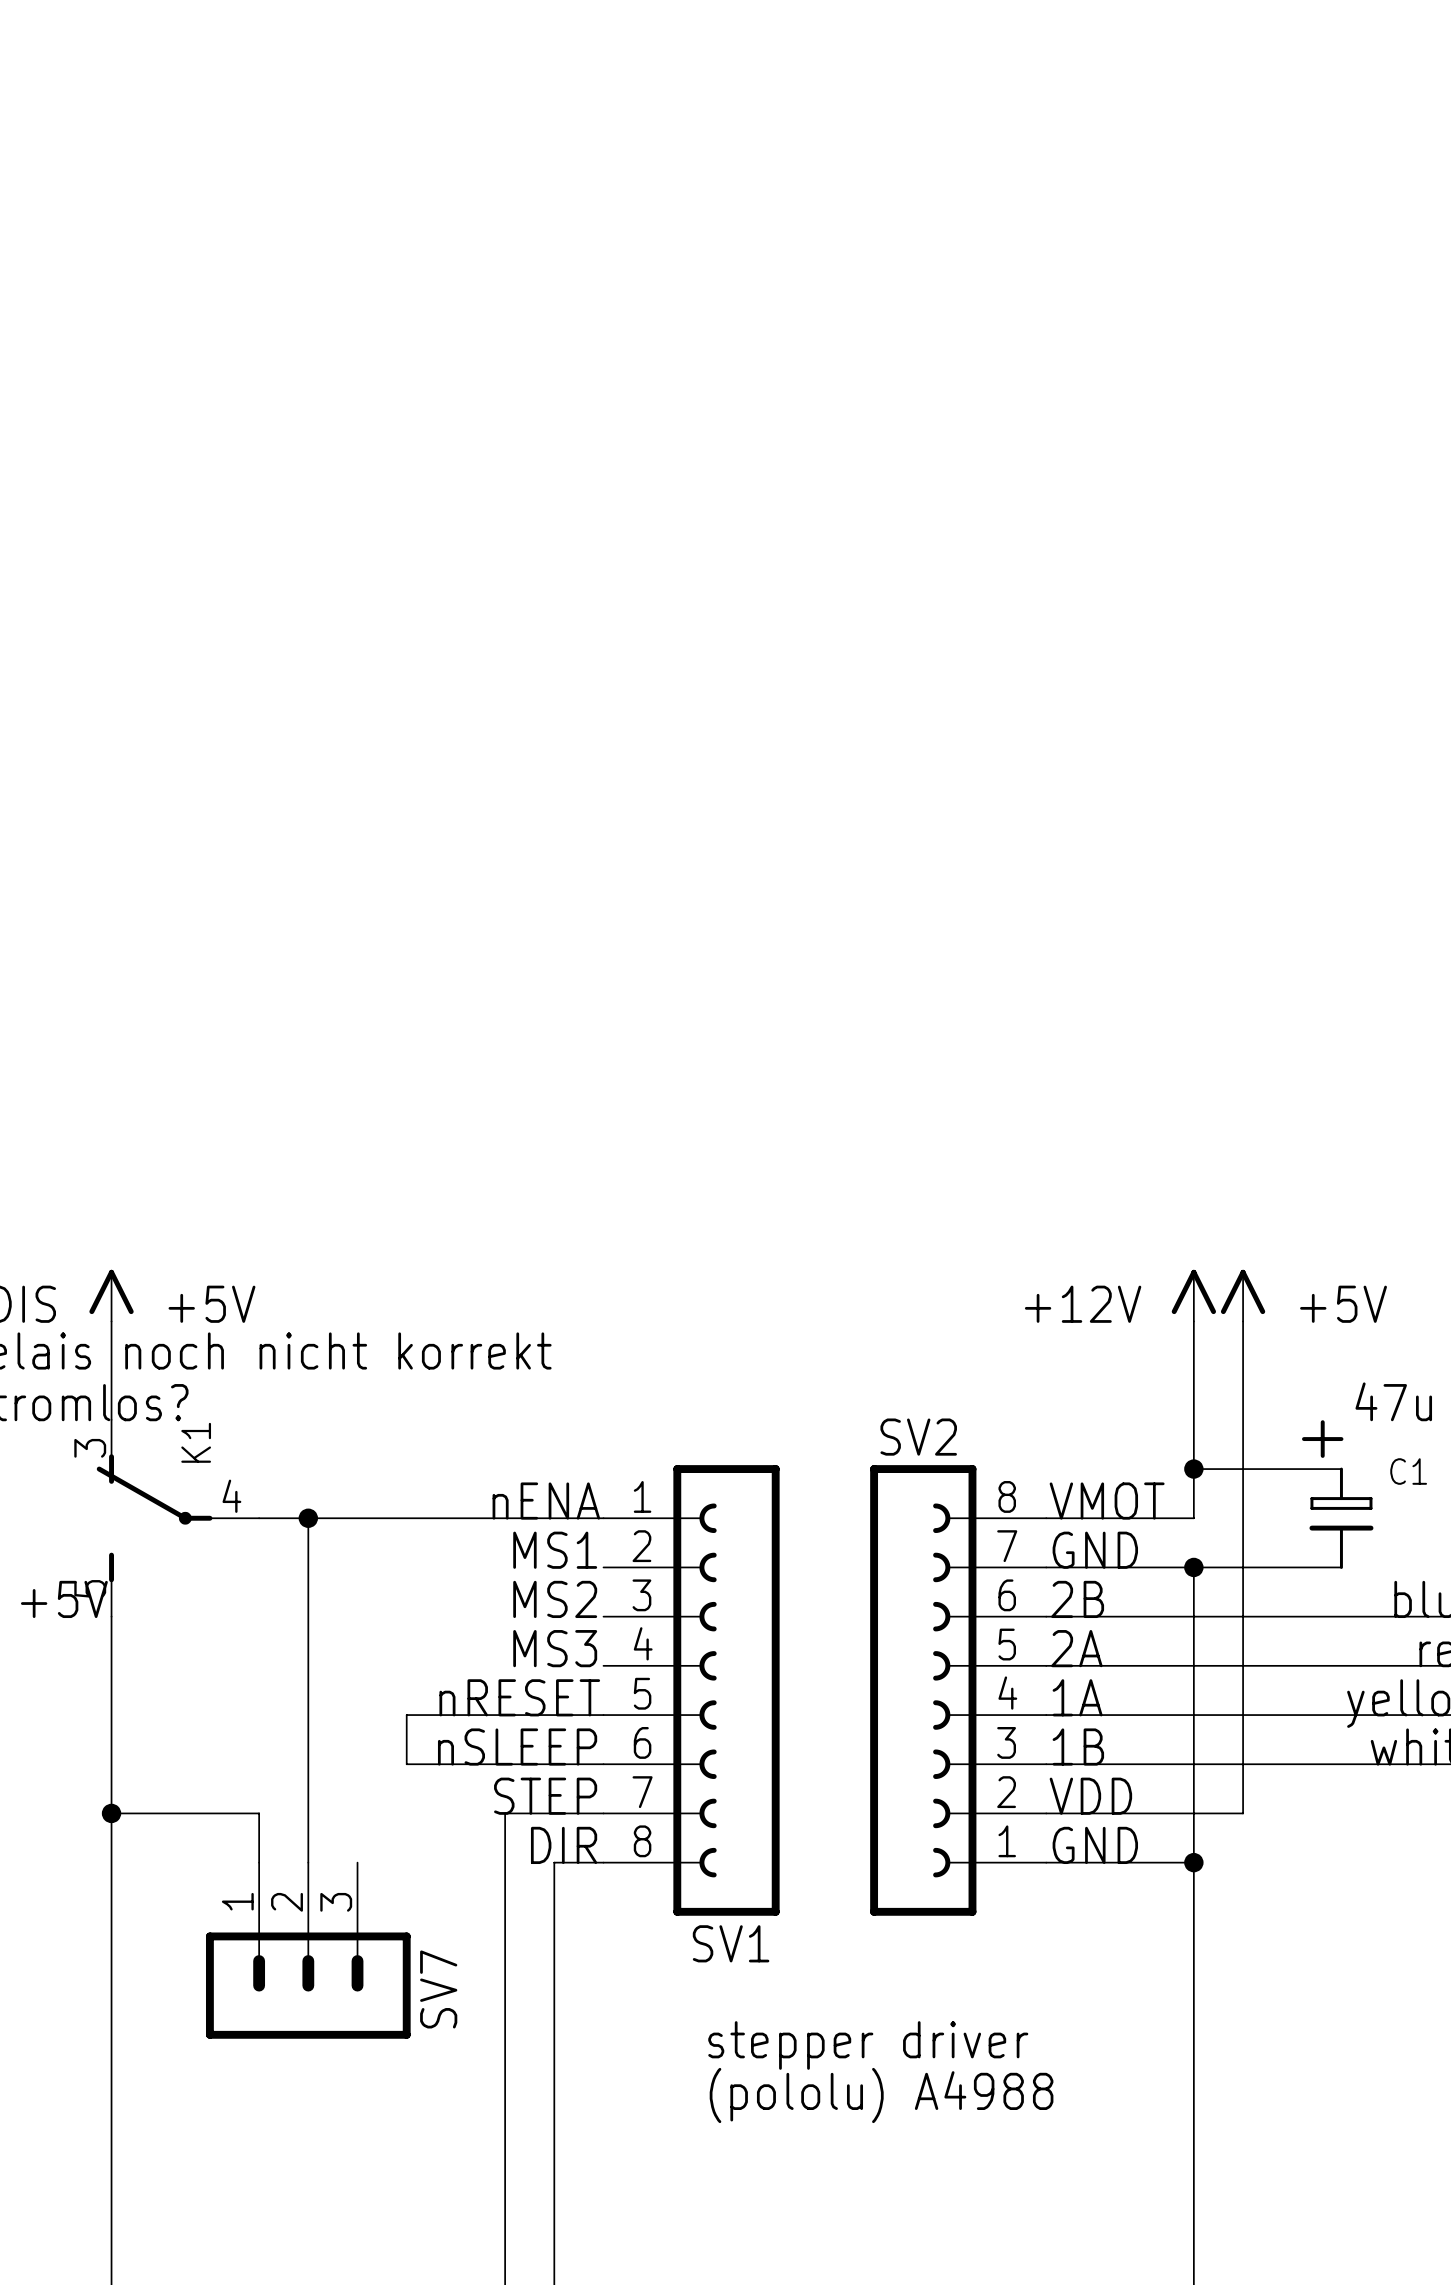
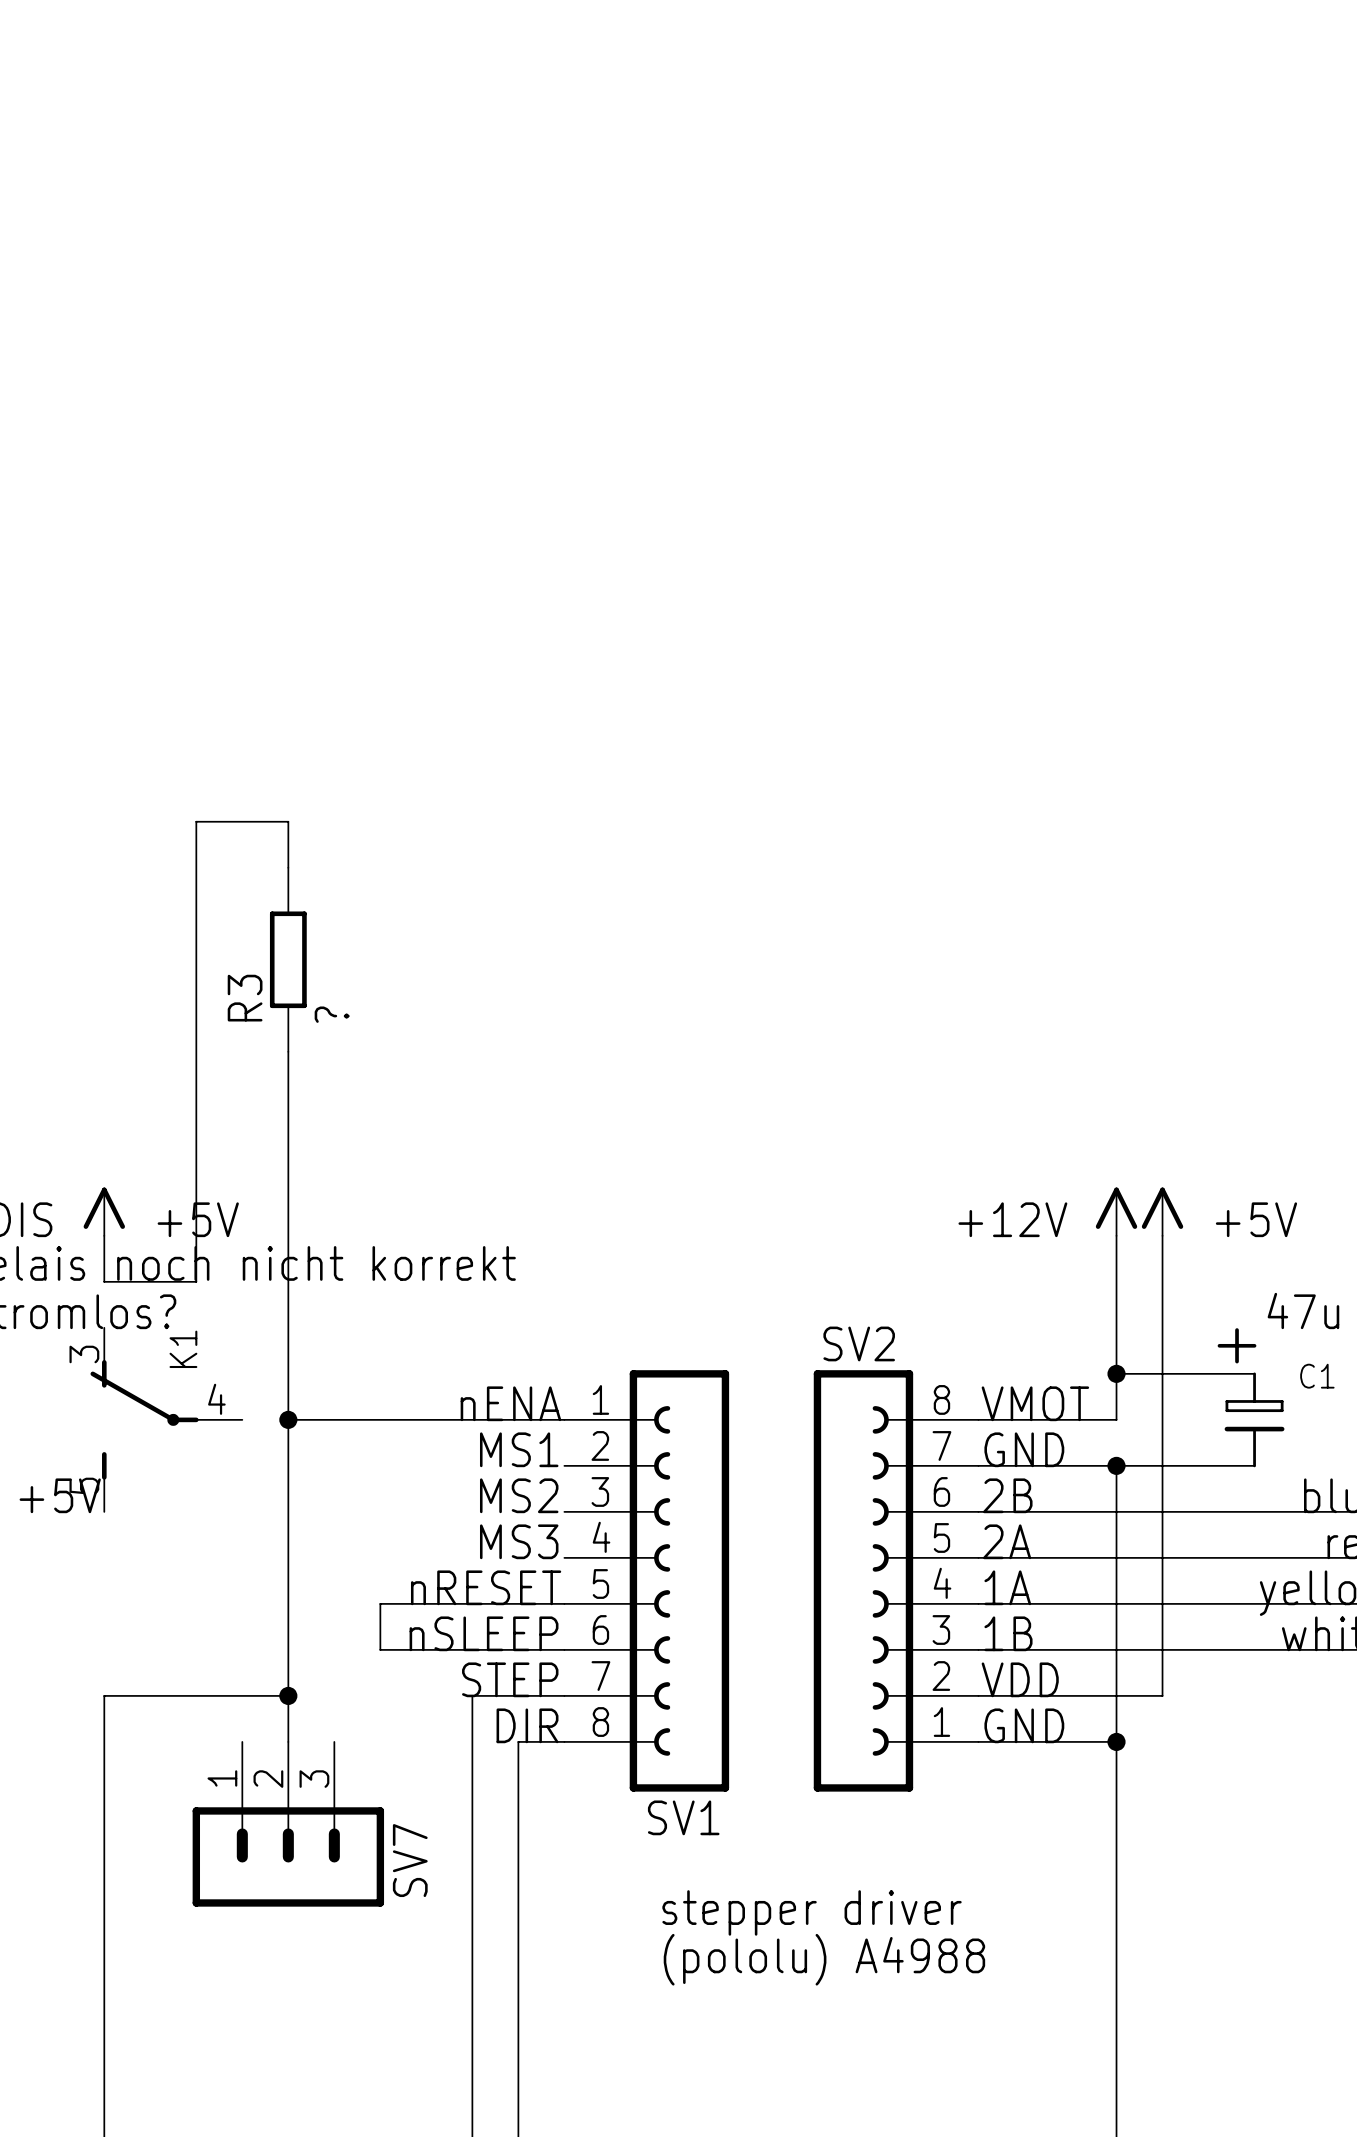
R3: none -> ? (288, 959)
wire: (111, 1370) (111, 1419) -> (104, 1281) (196, 1281) (196, 821) (288, 821) (288, 867)
wire: (259, 1518) (308, 1518) -> (288, 1051) (288, 1419)
wire: (111, 1616) (111, 1813) -> none
junction: (111, 1813) -> none
wire: (259, 1813) (259, 1862) -> (242, 1695) (288, 1695)
junction: none -> (288, 1695)

